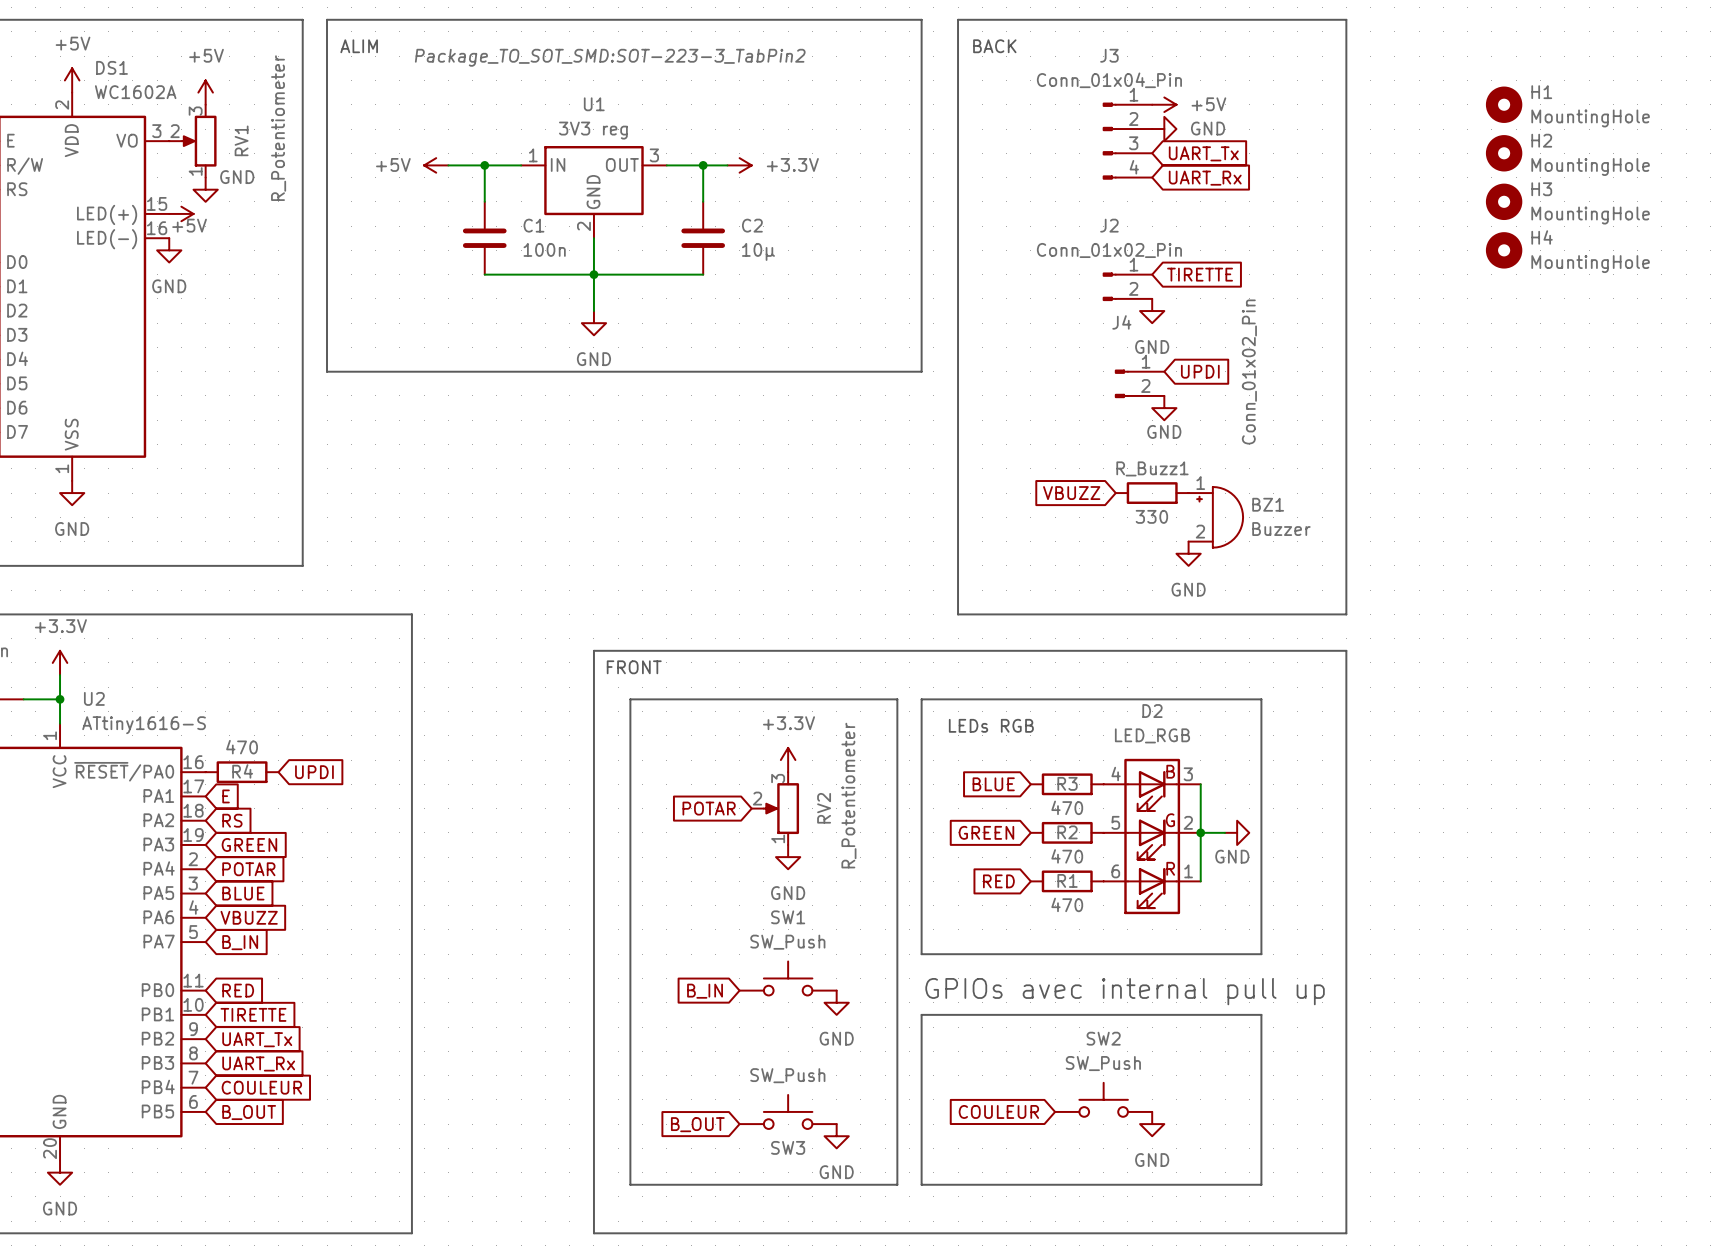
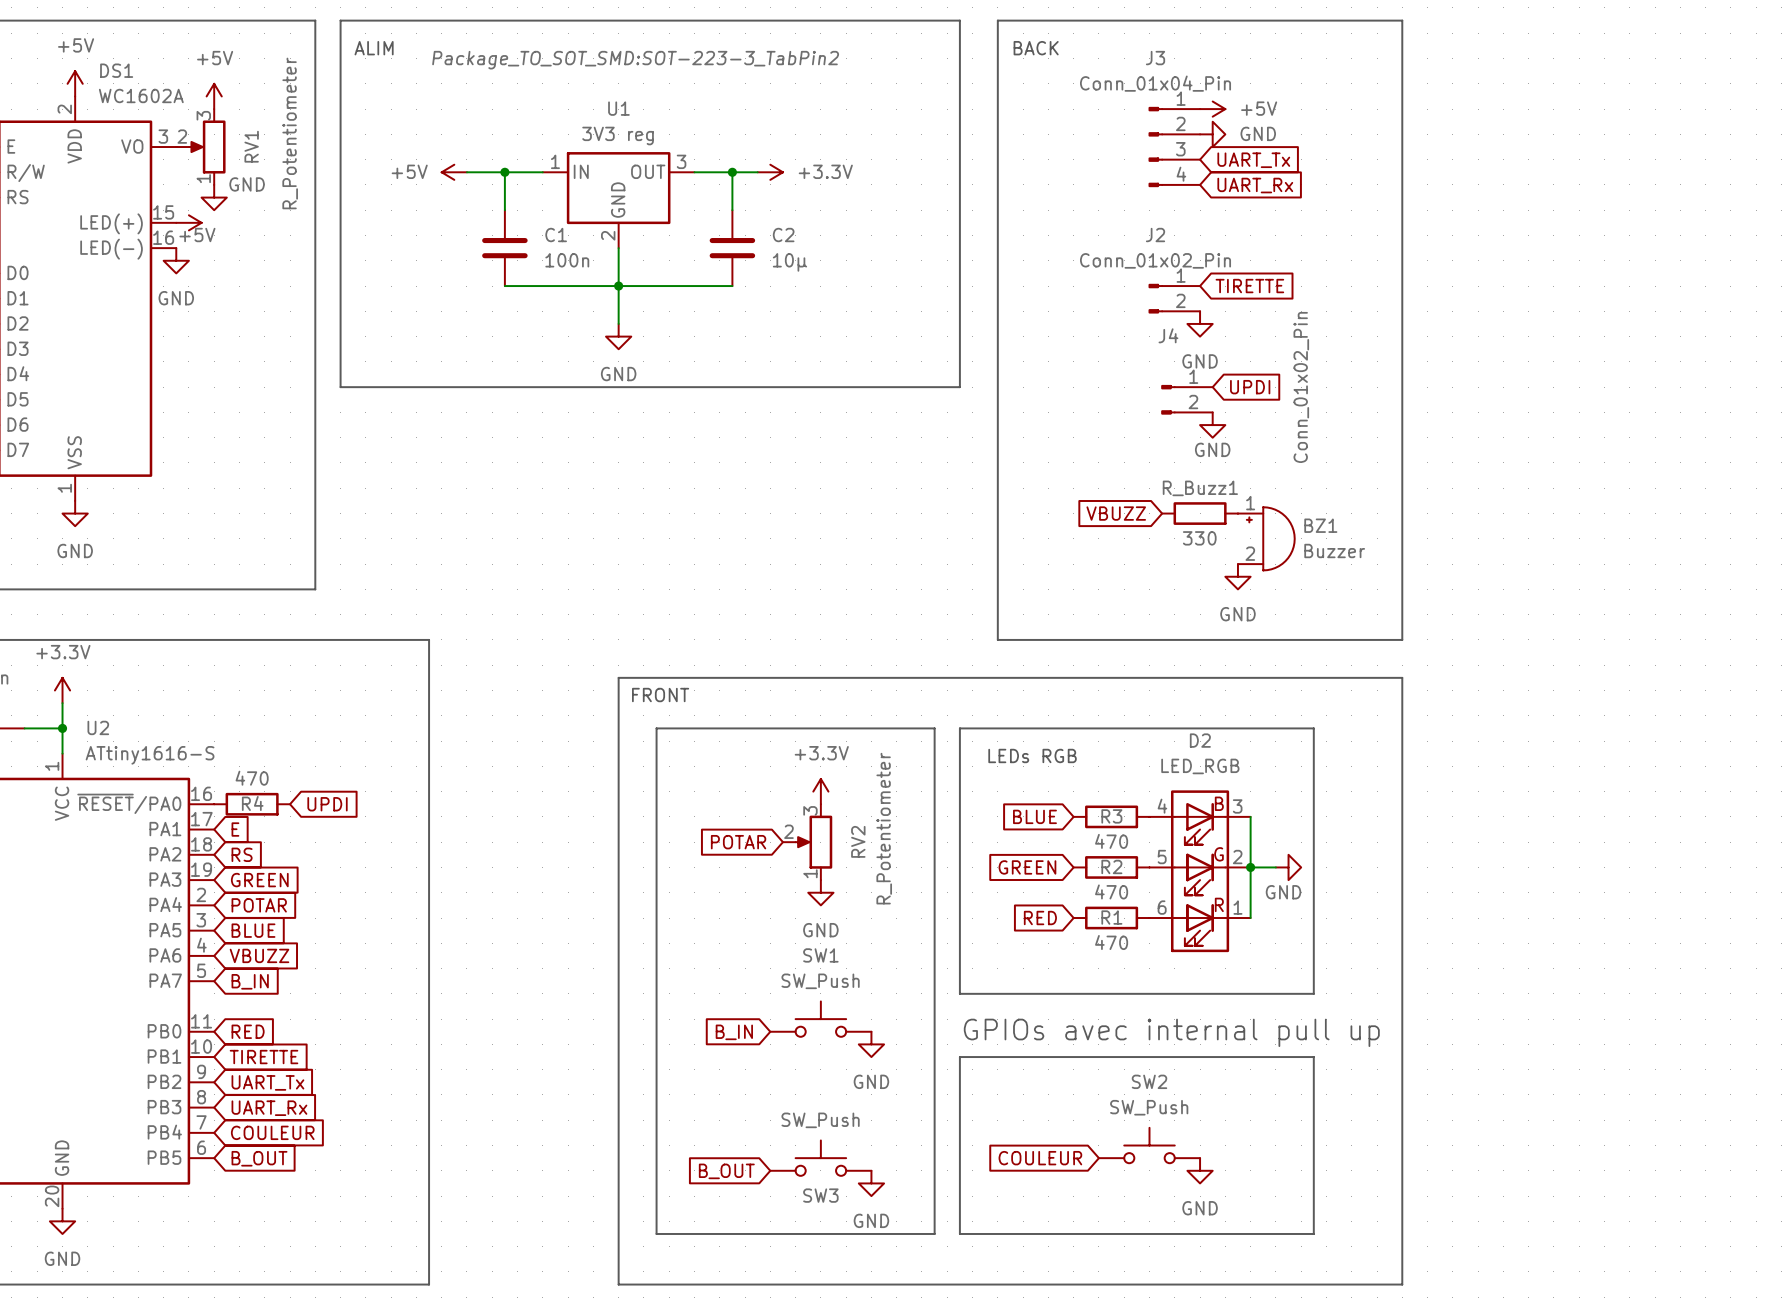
H1: MountingHole (1504, 104) -> none
H2: MountingHole (1504, 153) -> none
H3: MountingHole (1504, 201) -> none
H4: MountingHole (1504, 250) -> none

